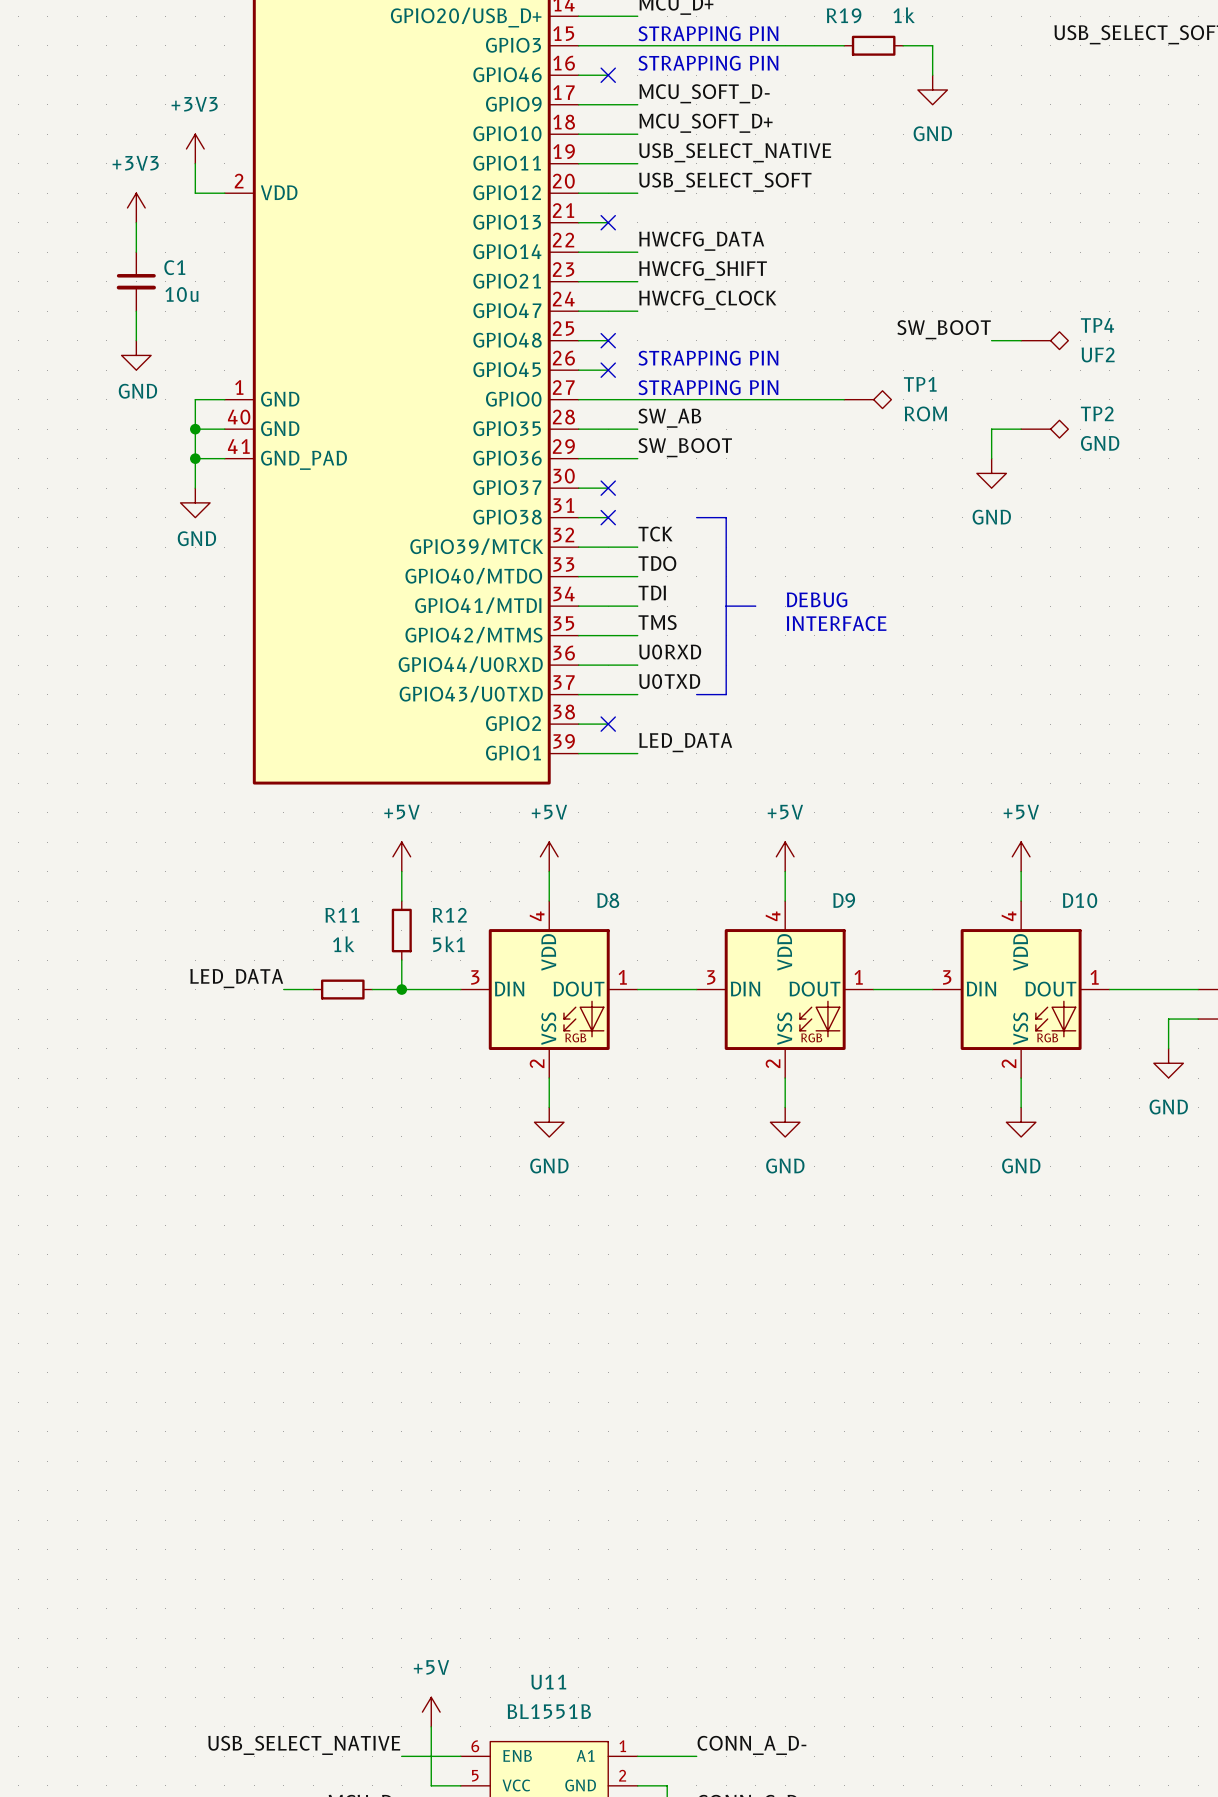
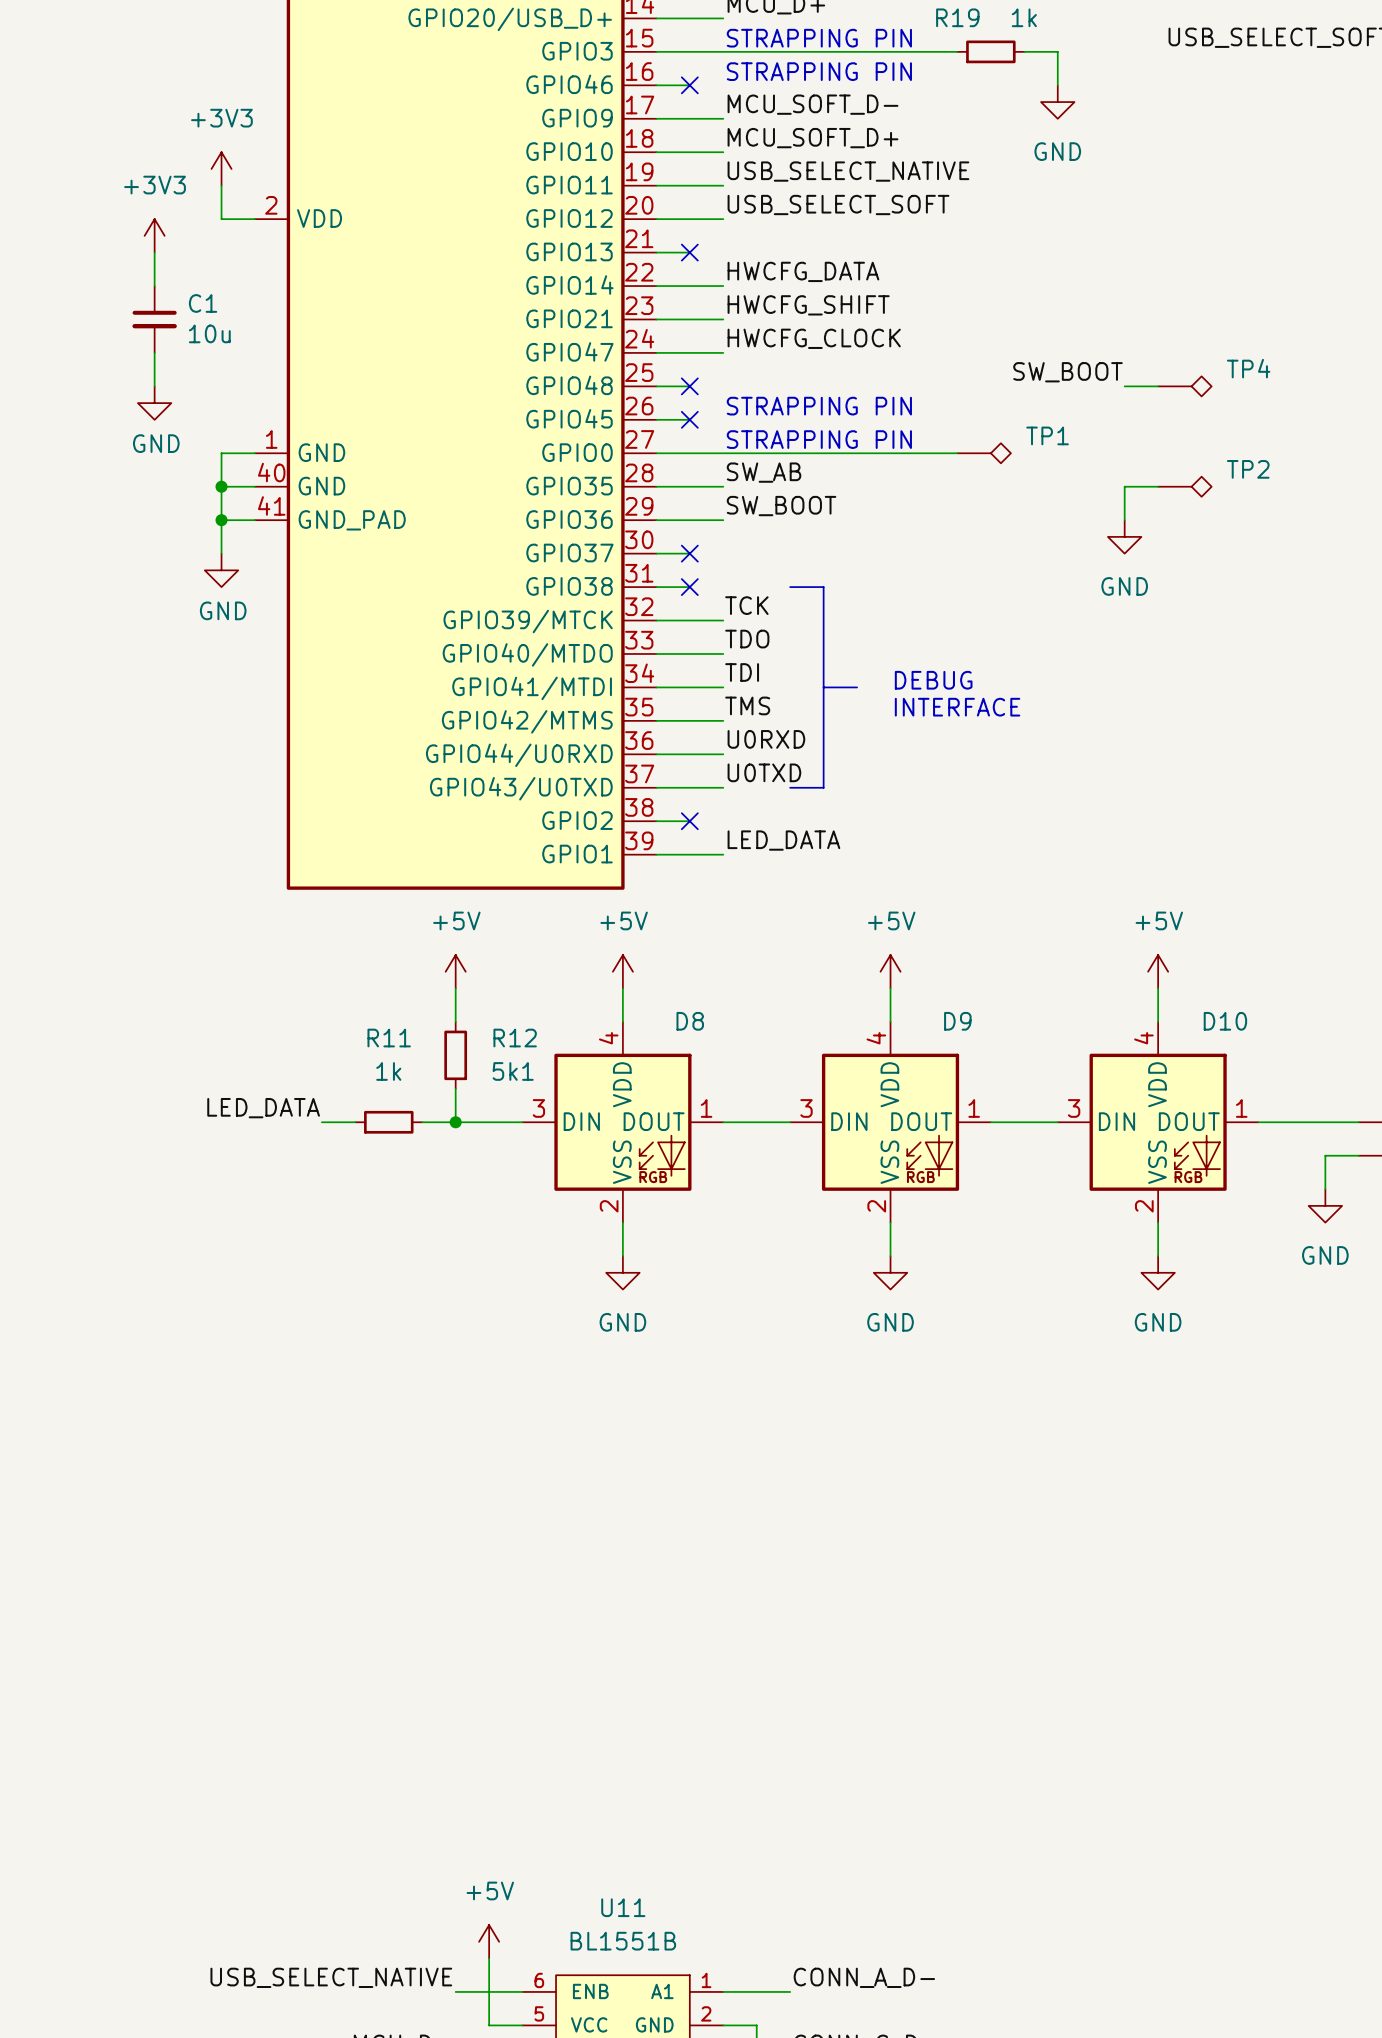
TP4 value: UF2 (1098, 354) -> none
TP1 value: ROM (925, 413) -> none
TP2 value: GND (1100, 443) -> none

